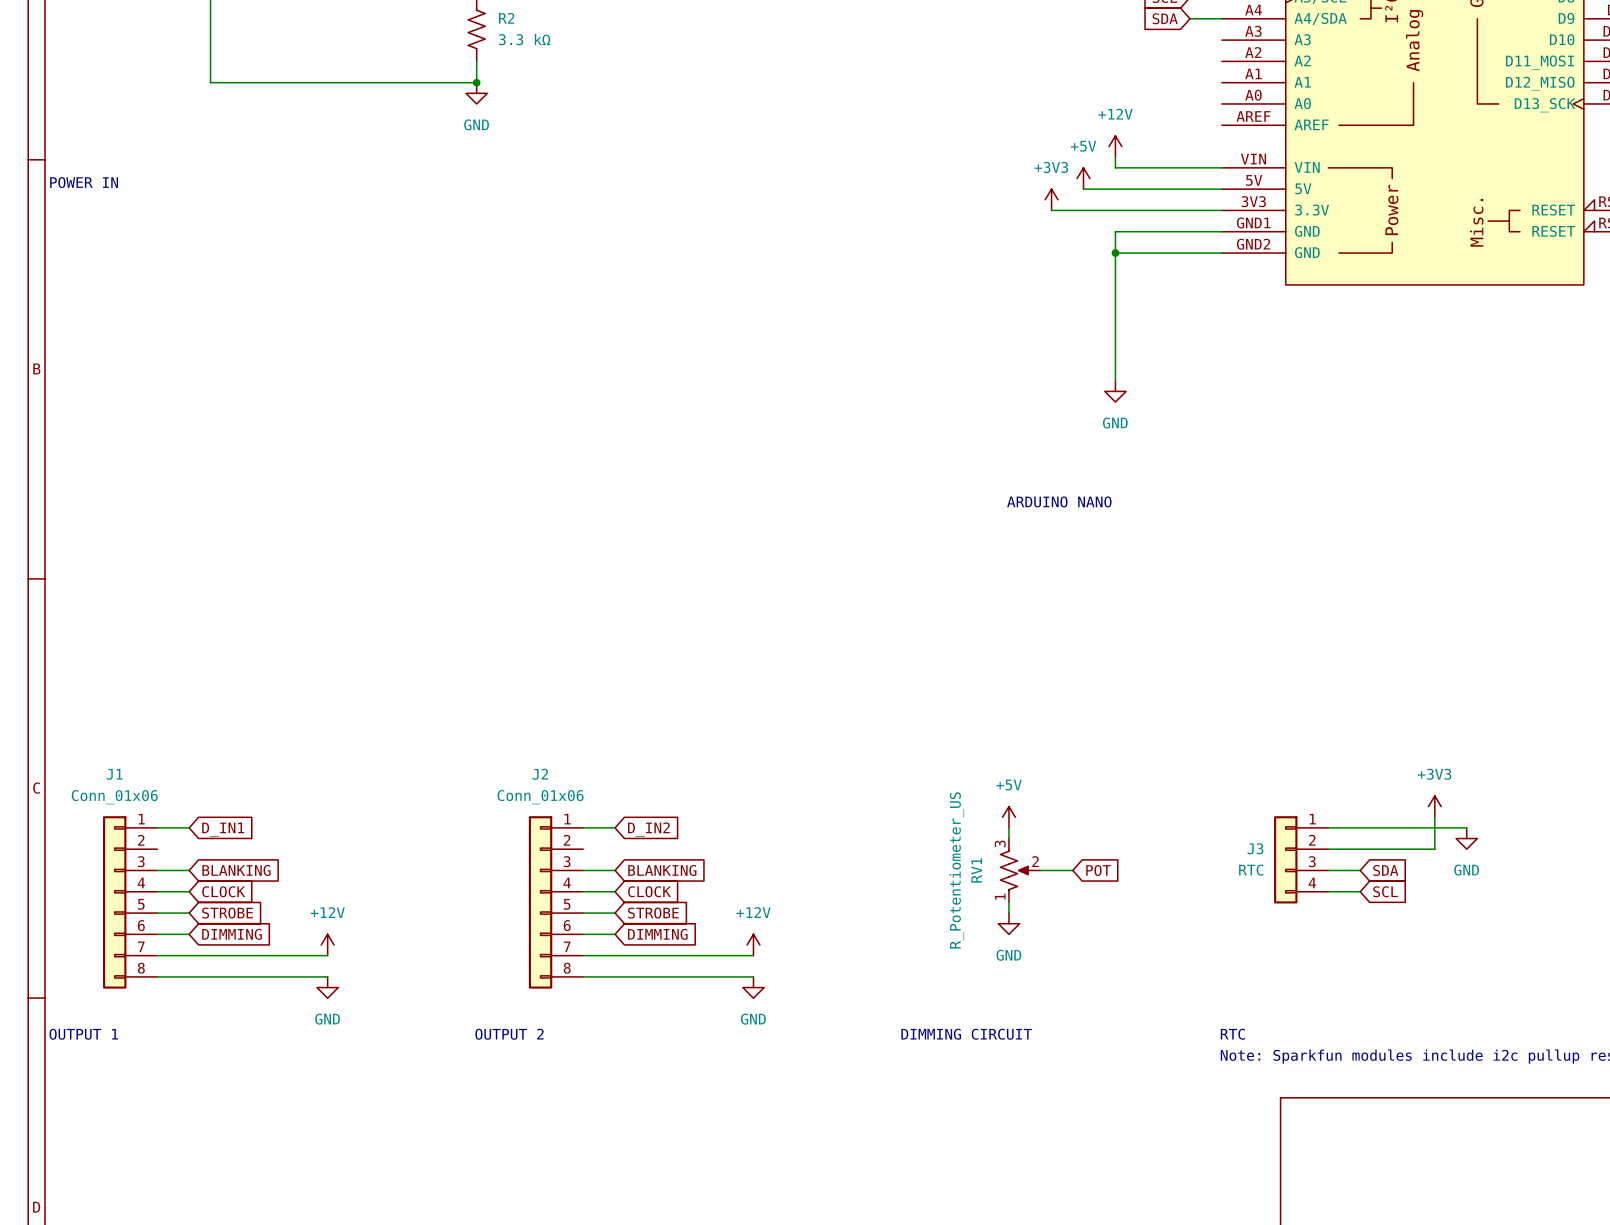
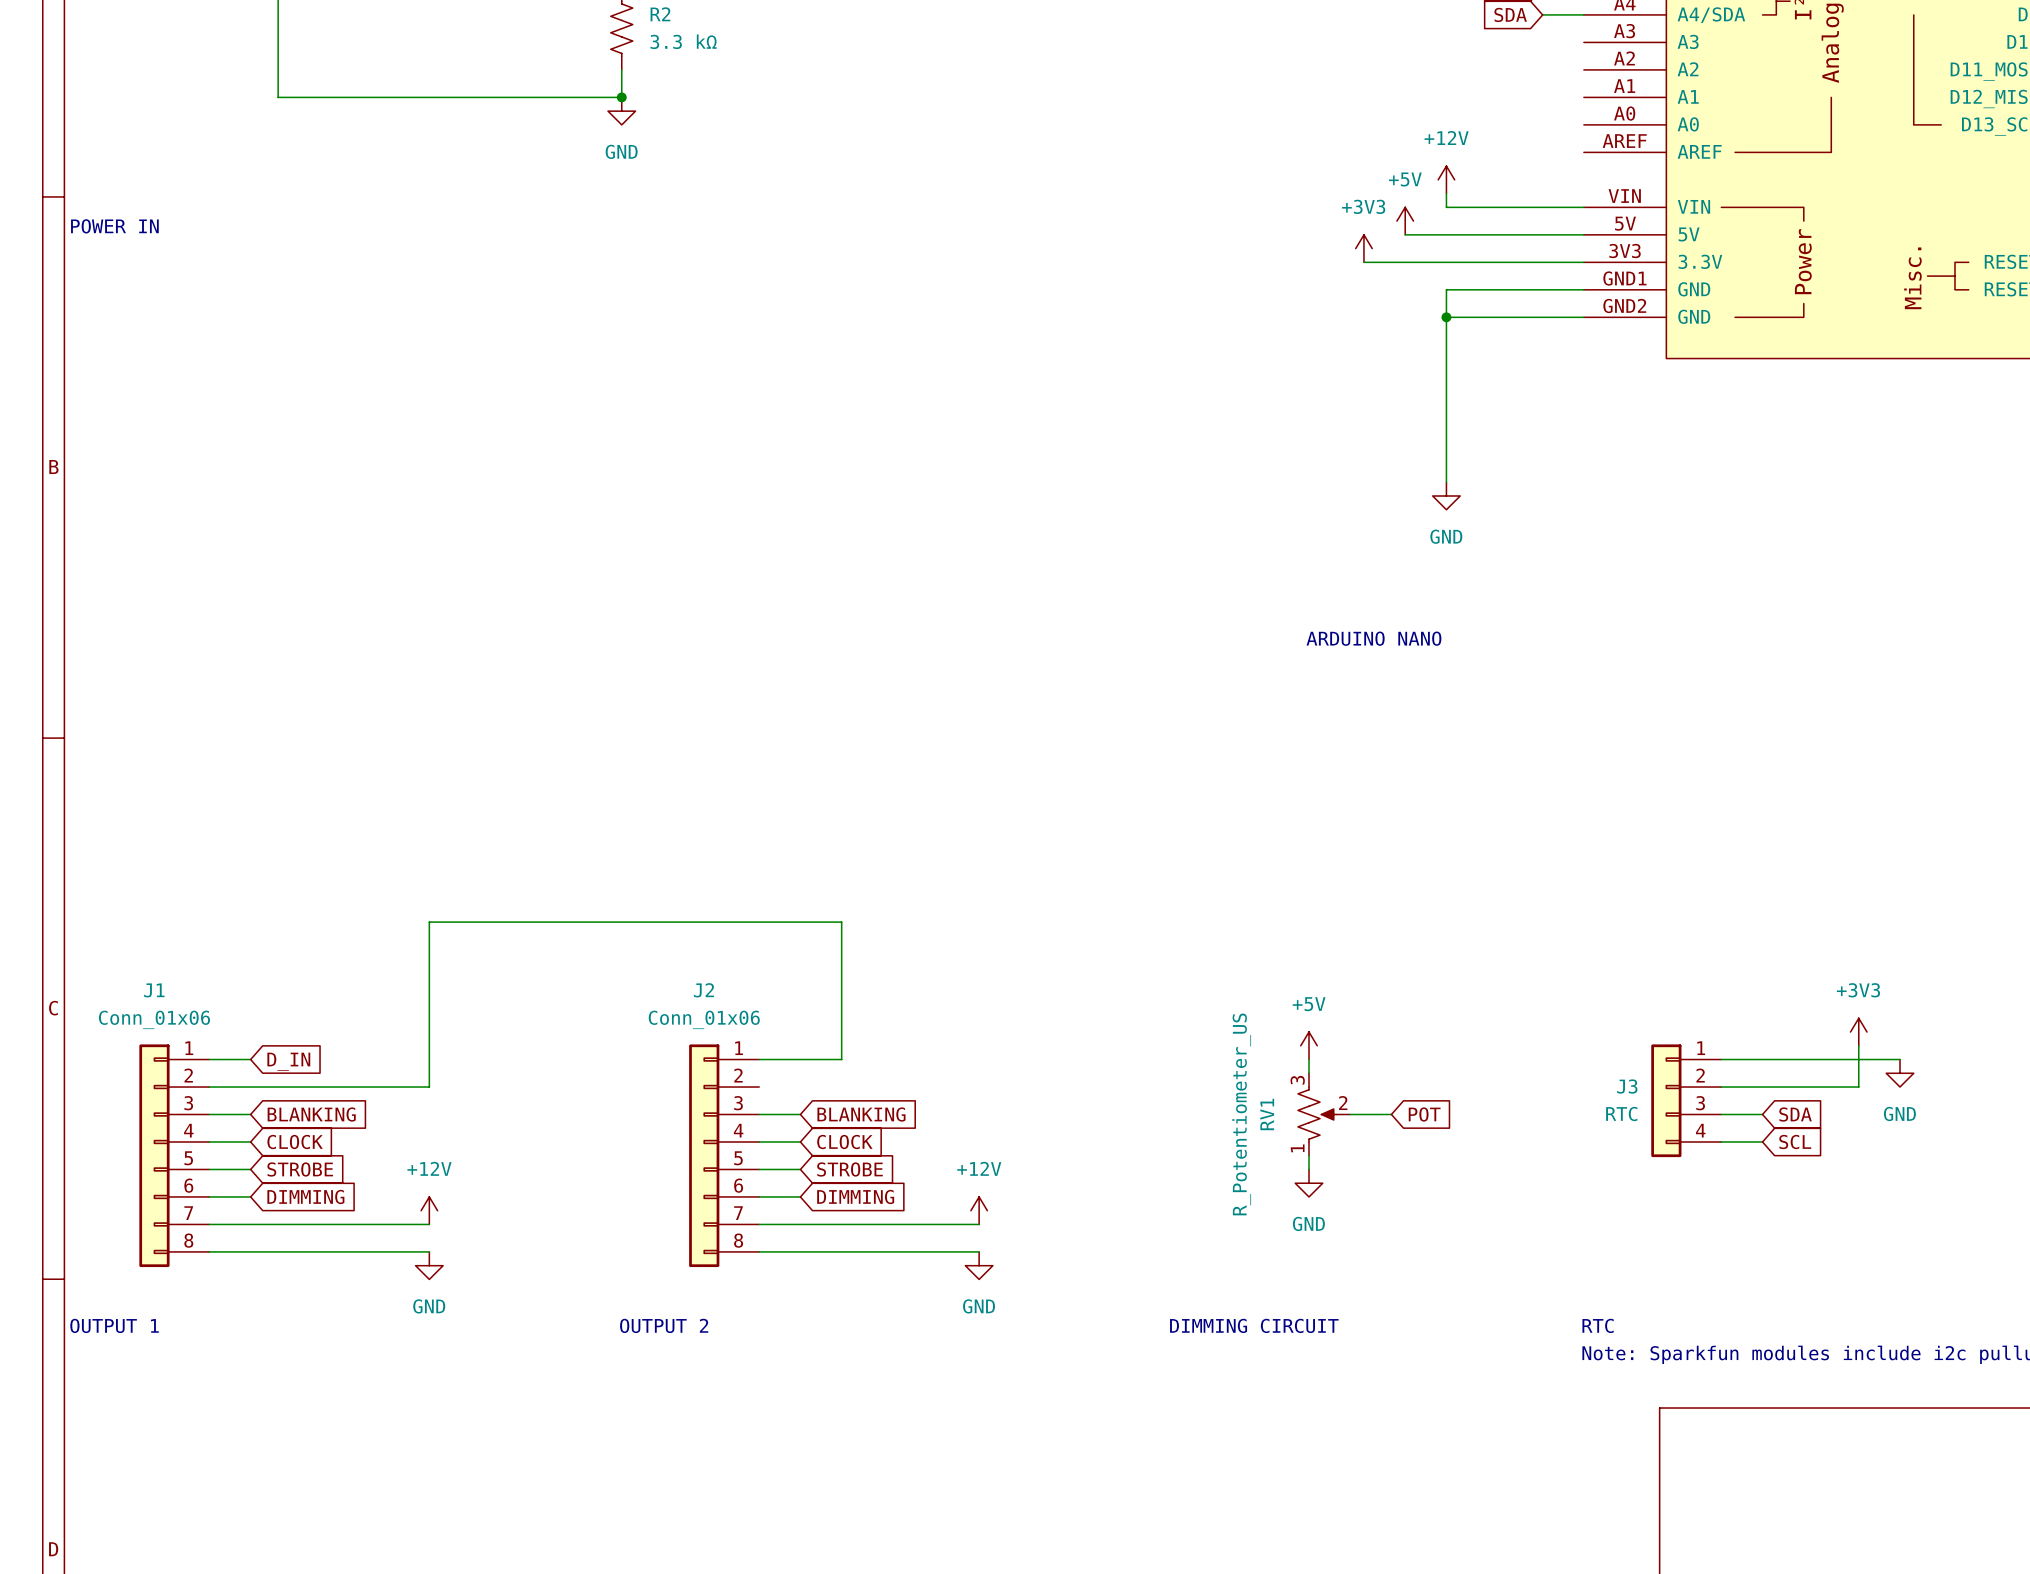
wire: none -> (800, 1059) (841, 1059) (841, 922) (429, 922) (429, 1087) (209, 1087)
global label: D_IN1 (223, 829) -> D_IN (288, 1061)
global label: D_IN2 (648, 829) -> none

